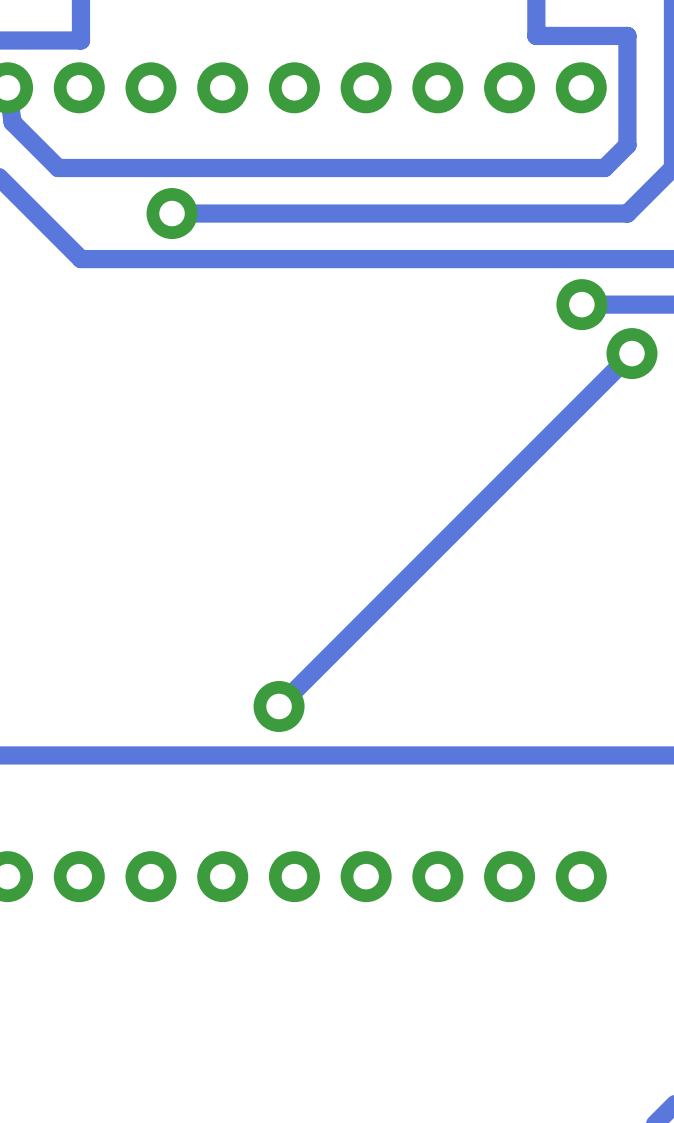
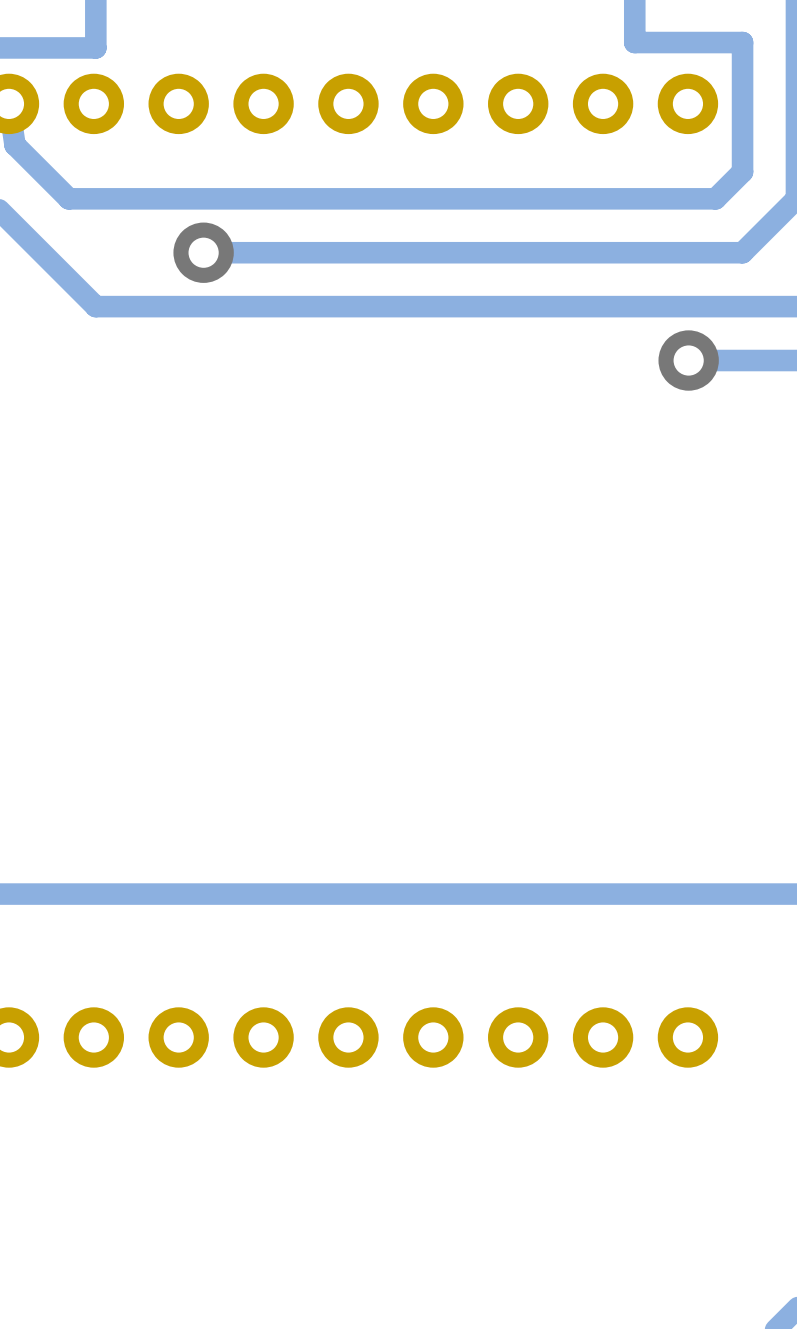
track: (631, 353) (279, 706) -> none
via: (631, 353) -> none
via: (279, 706) -> none

